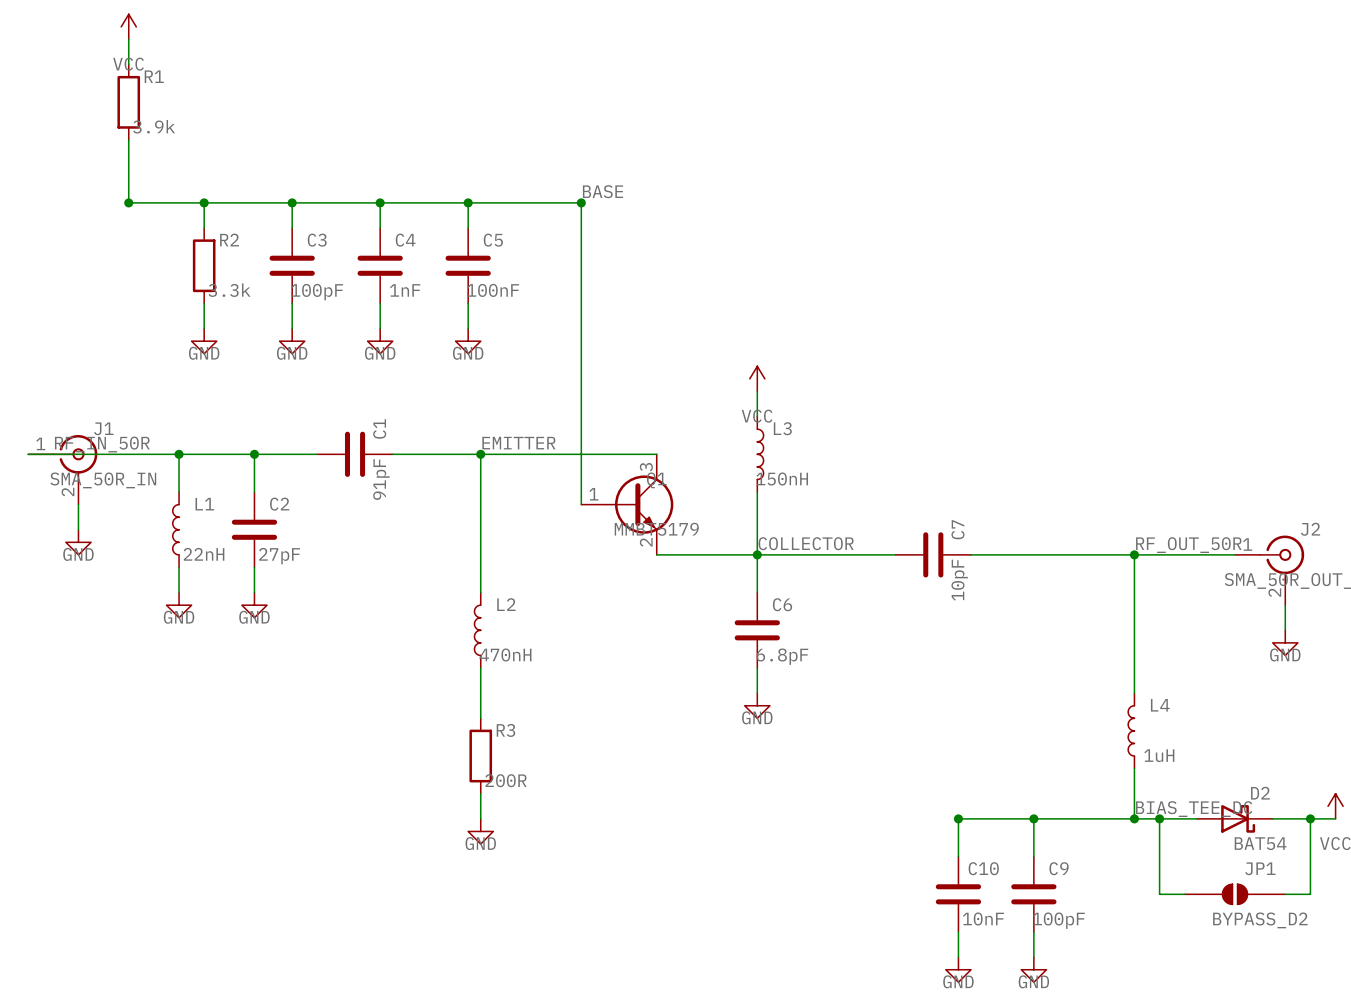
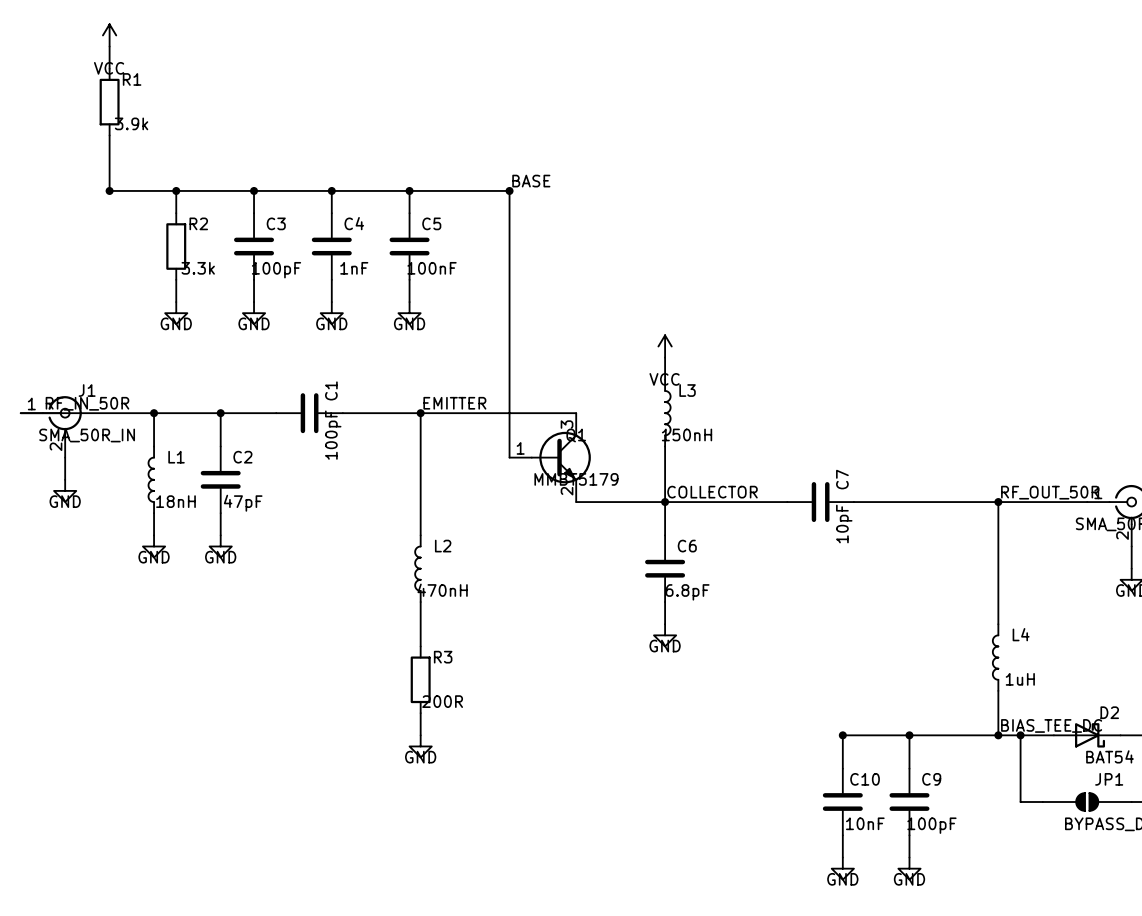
C1 value: 91pF (381, 479) -> 100pF (333, 435)
L1 value: 22nH (204, 554) -> 18nH (175, 501)
C2 value: 27pF (279, 556) -> 47pF (243, 503)

